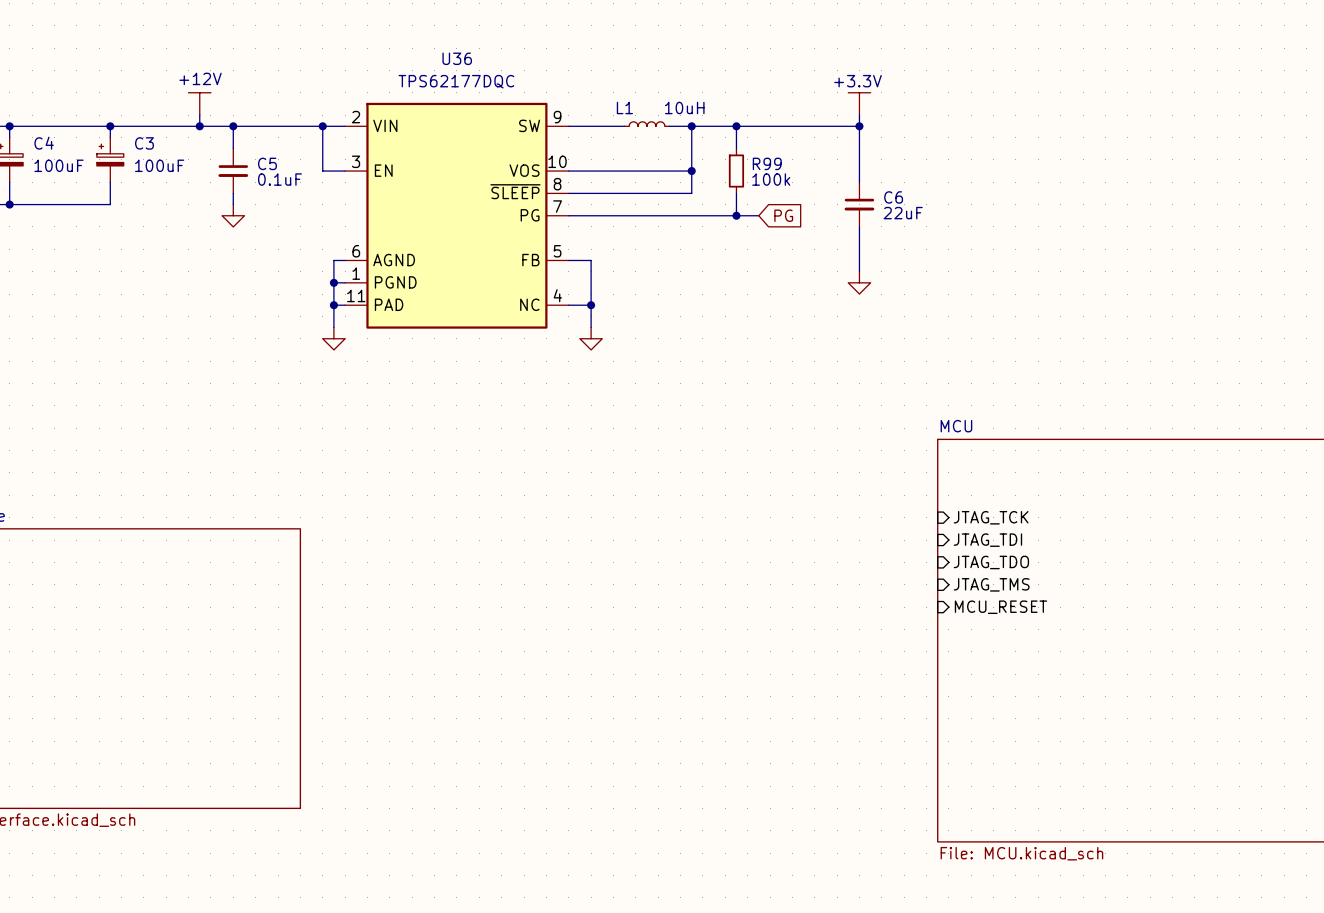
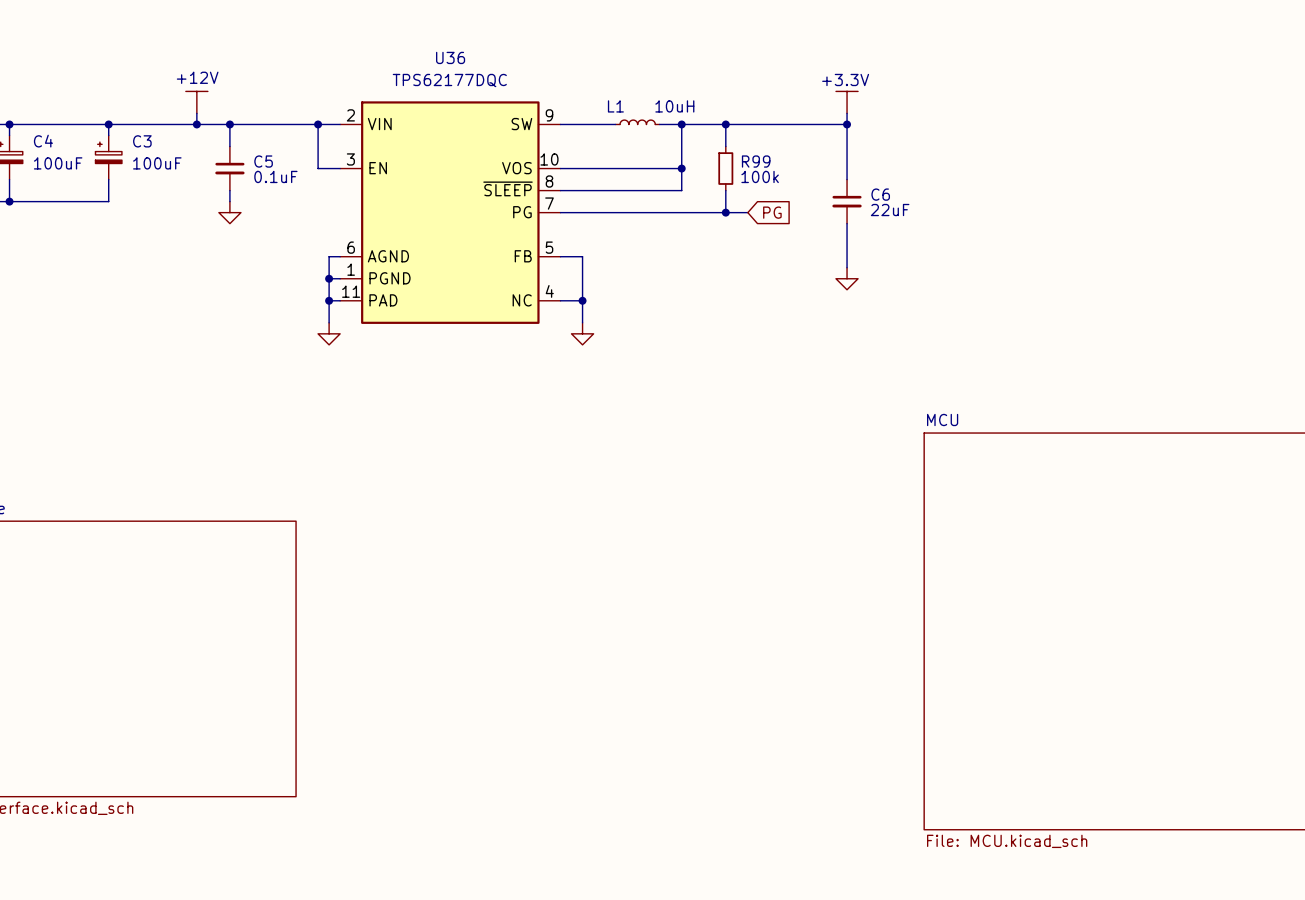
sheet pin: JTAG_TCK (991, 517) -> none
sheet pin: JTAG_TDI (987, 540) -> none
sheet pin: JTAG_TDO (991, 562) -> none
sheet pin: JTAG_TMS (991, 584) -> none
sheet pin: MCU_RESET (1000, 607) -> none

